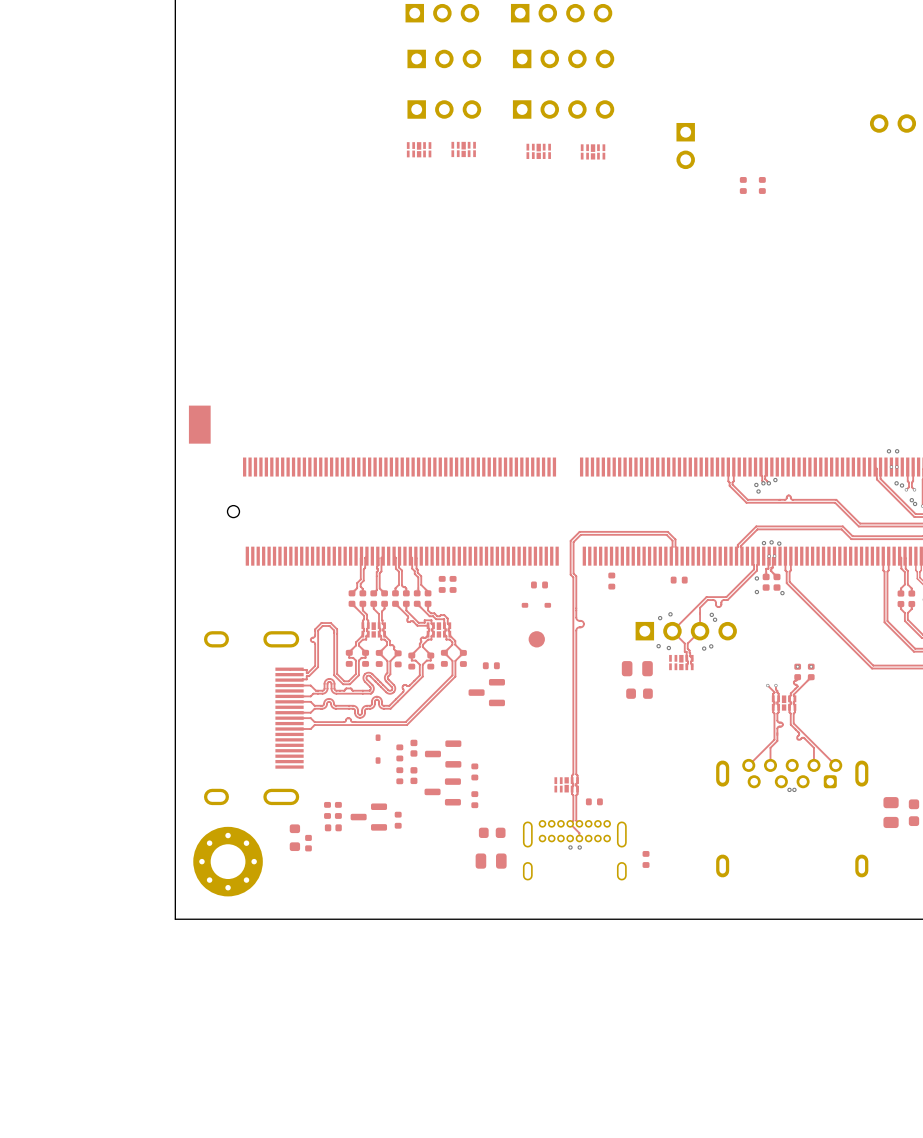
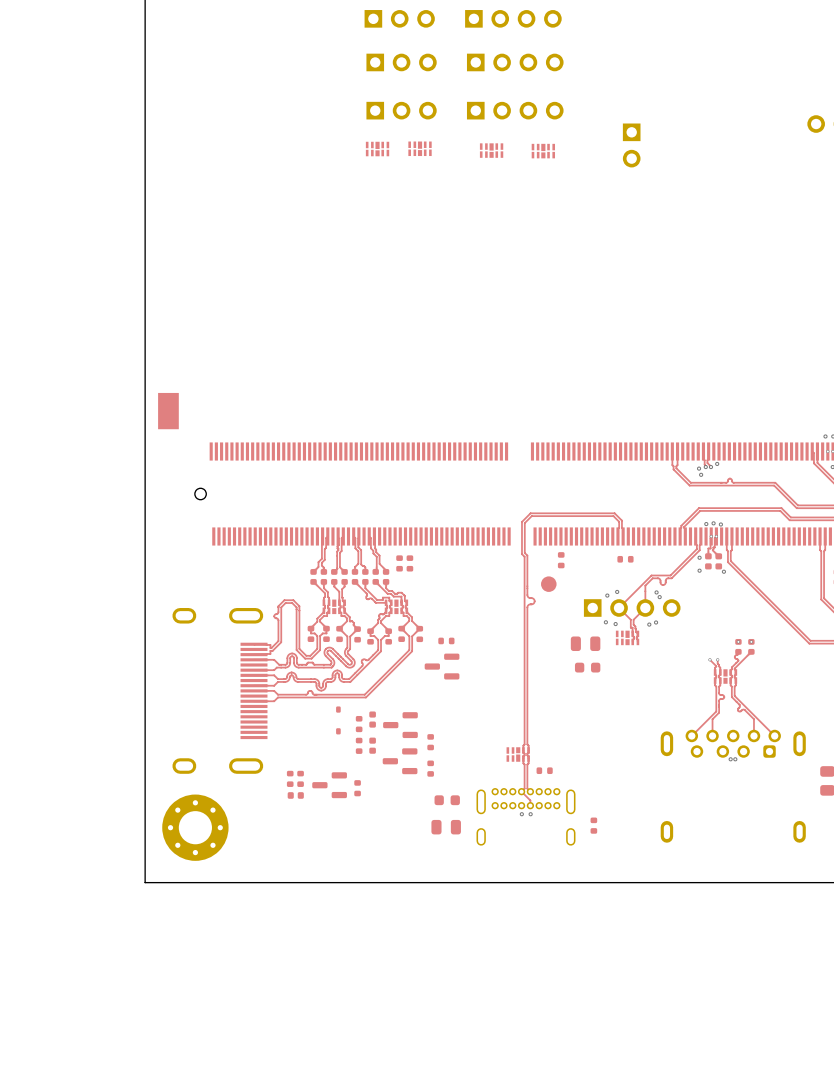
part: (743, 185) -> none
part: (762, 185) -> none
part: (539, 584) -> none
part: (536, 605) -> none
part position: (536, 639) -> (548, 584)
part: (294, 837) -> none
part: (308, 843) -> none

